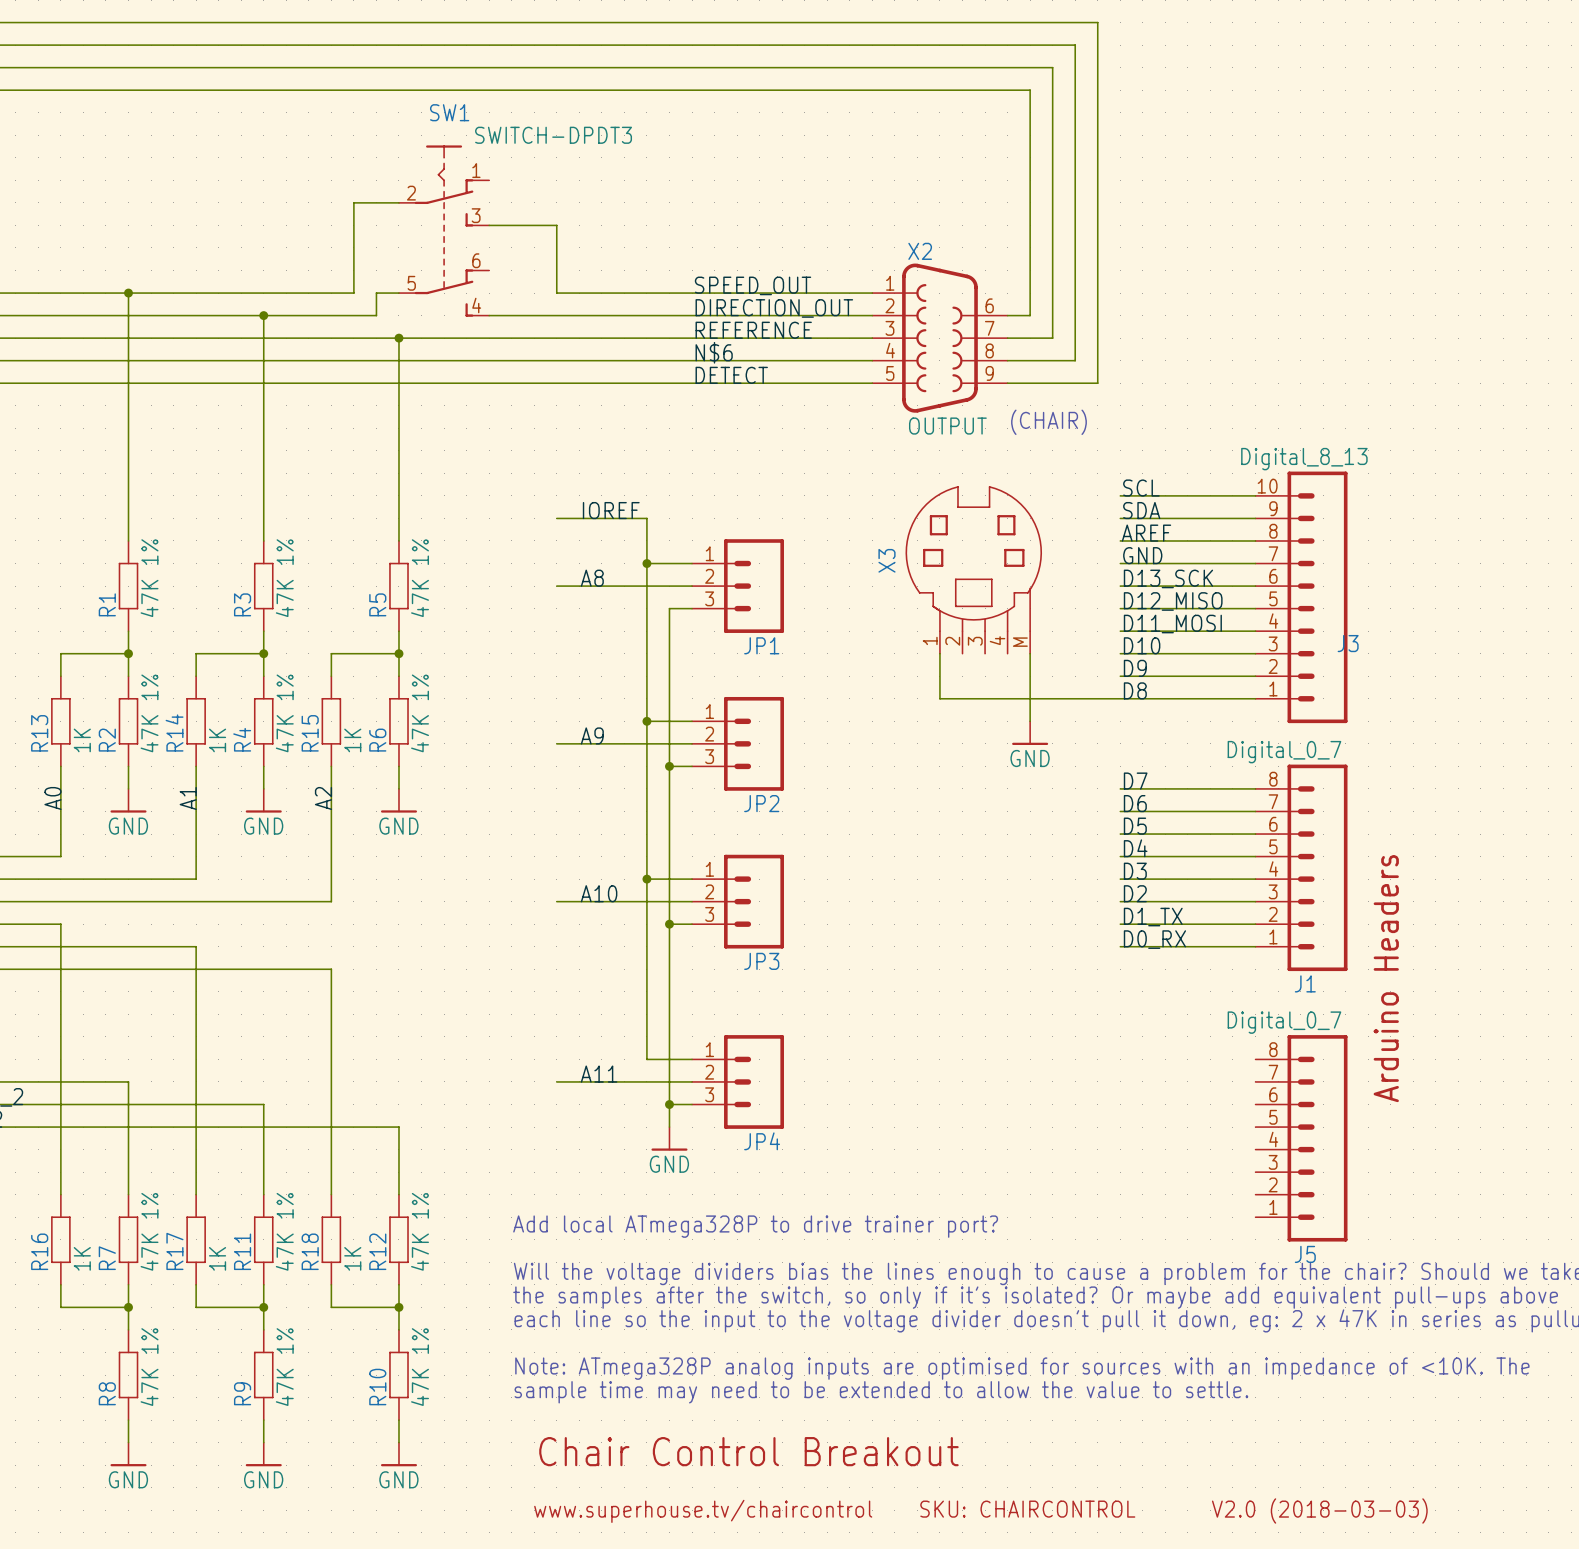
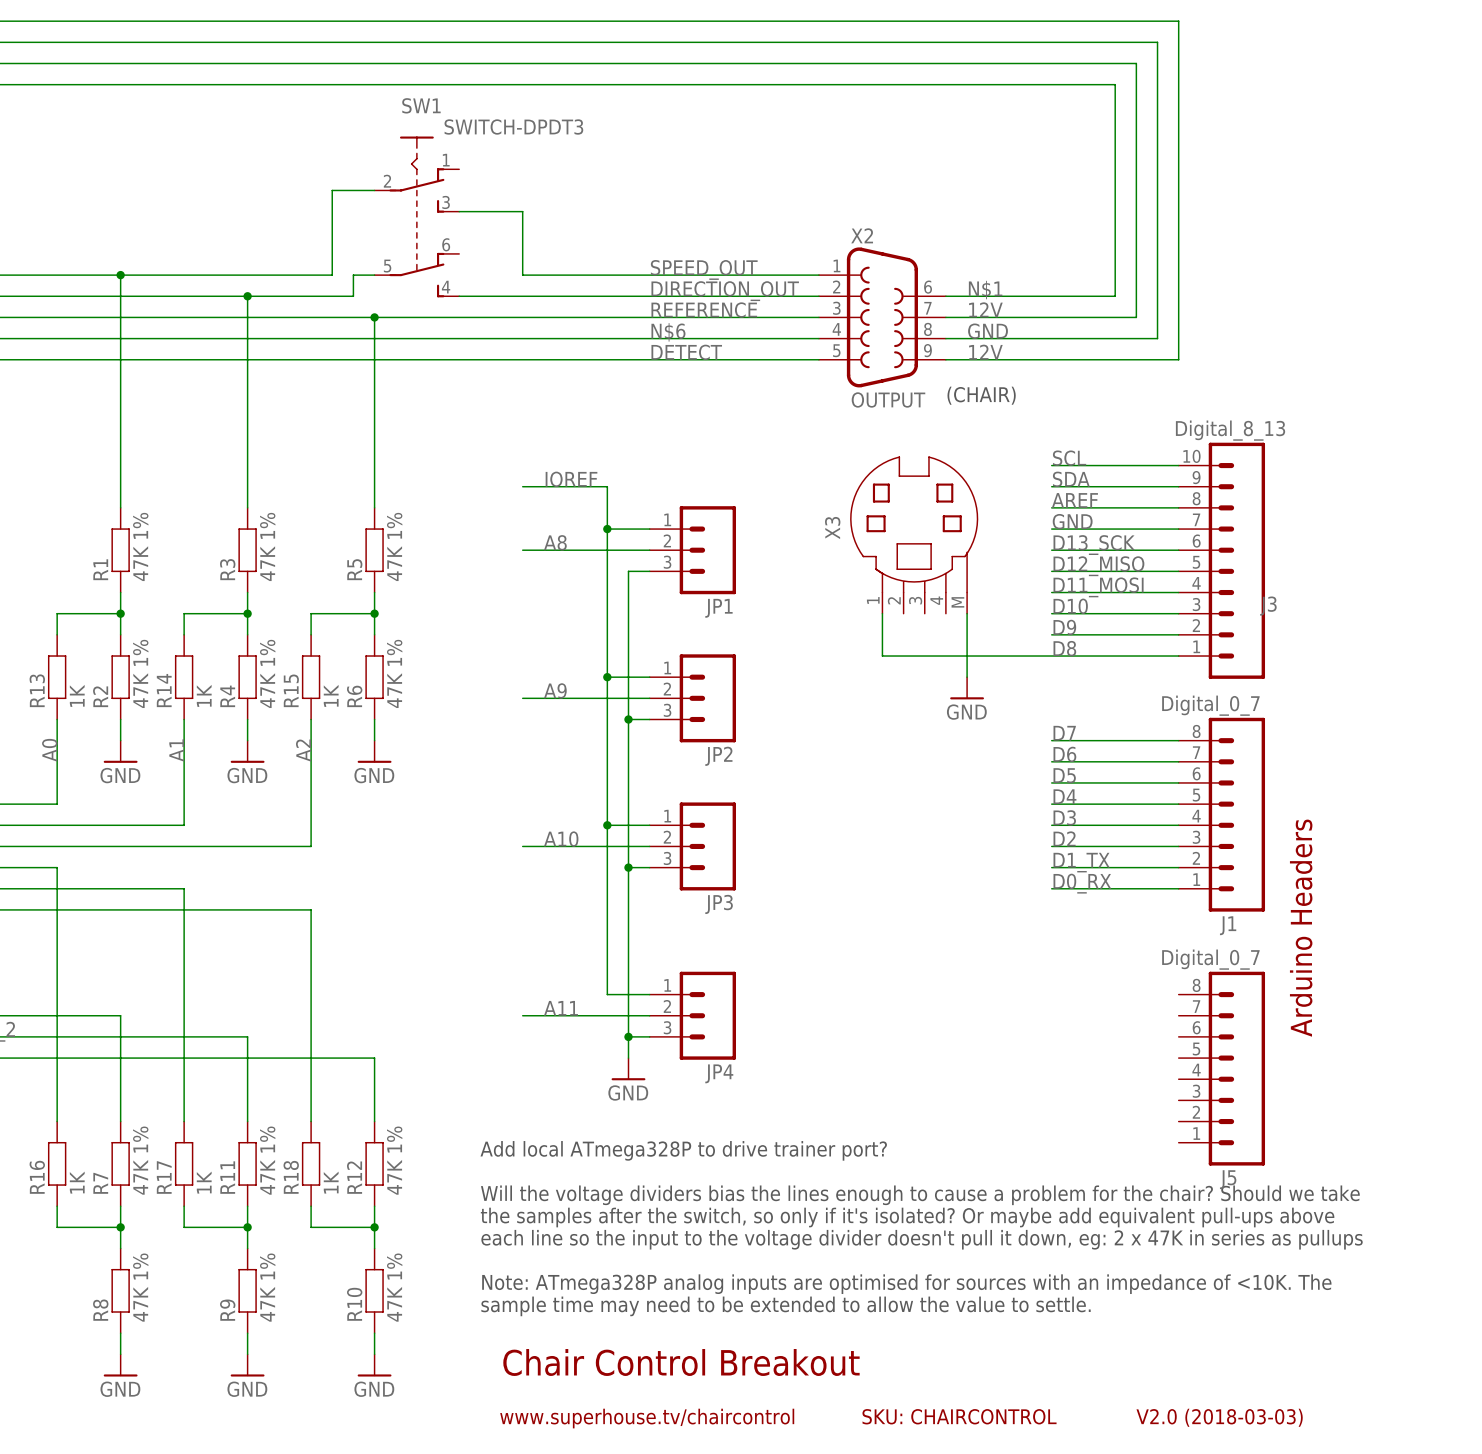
wire: (1097, 22) (1097, 383) -> (1030, 21) (1178, 21) (1178, 359) (1030, 359)
wire: (1075, 45) (1075, 360) -> (1009, 42) (1157, 42) (1157, 338) (1009, 338)
wire: (1052, 67) (1052, 338) -> (988, 63) (1136, 63) (1136, 317) (988, 317)
wire: (1030, 90) (1030, 315) -> (967, 84) (1115, 84) (1115, 296) (967, 296)
label: none -> N$1 (985, 290)
label: none -> 12V (985, 309)
label: none -> GND (988, 331)
label: none -> 12V (985, 352)

